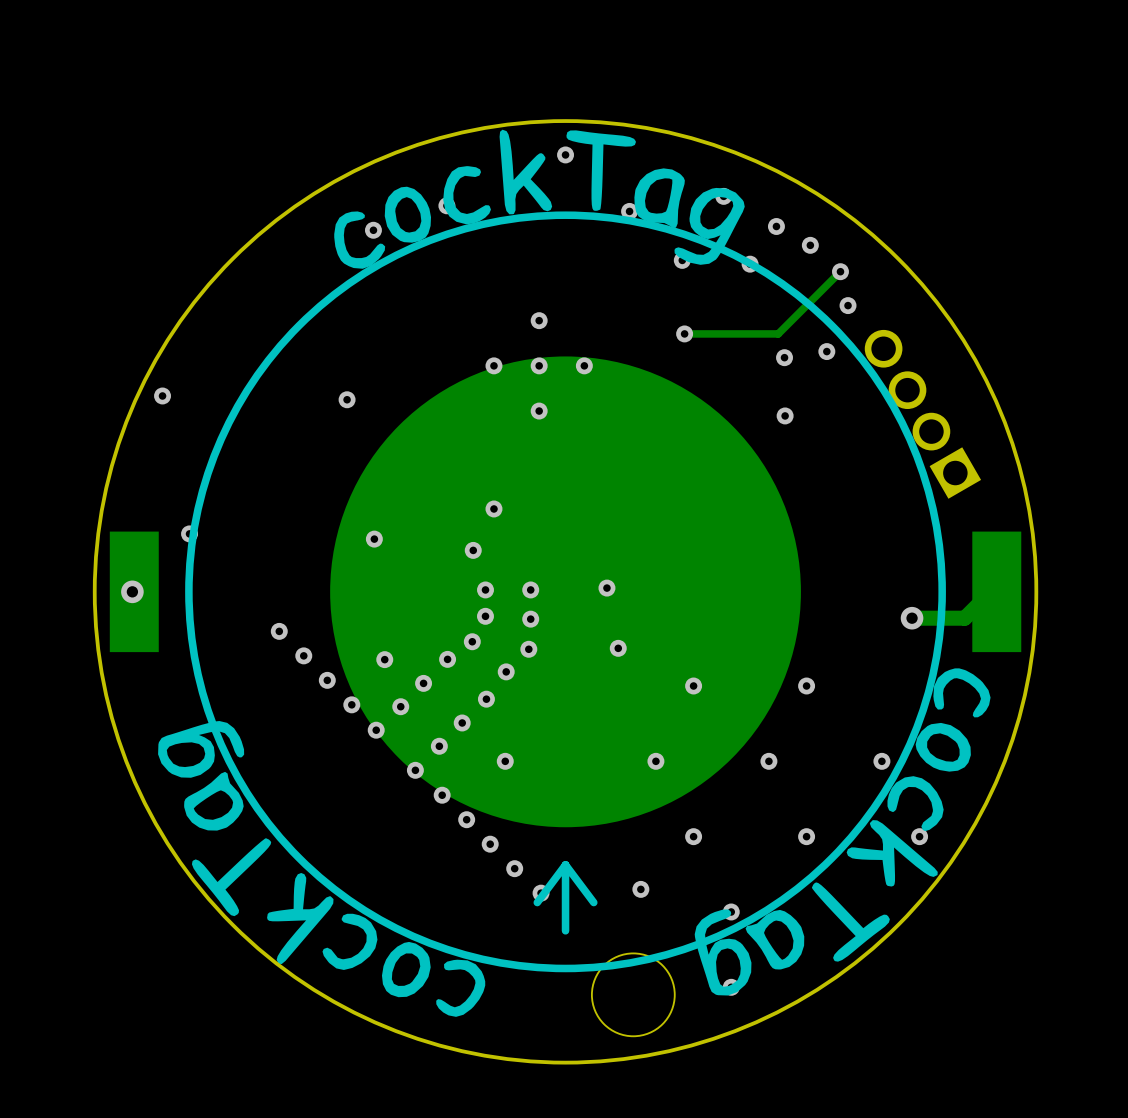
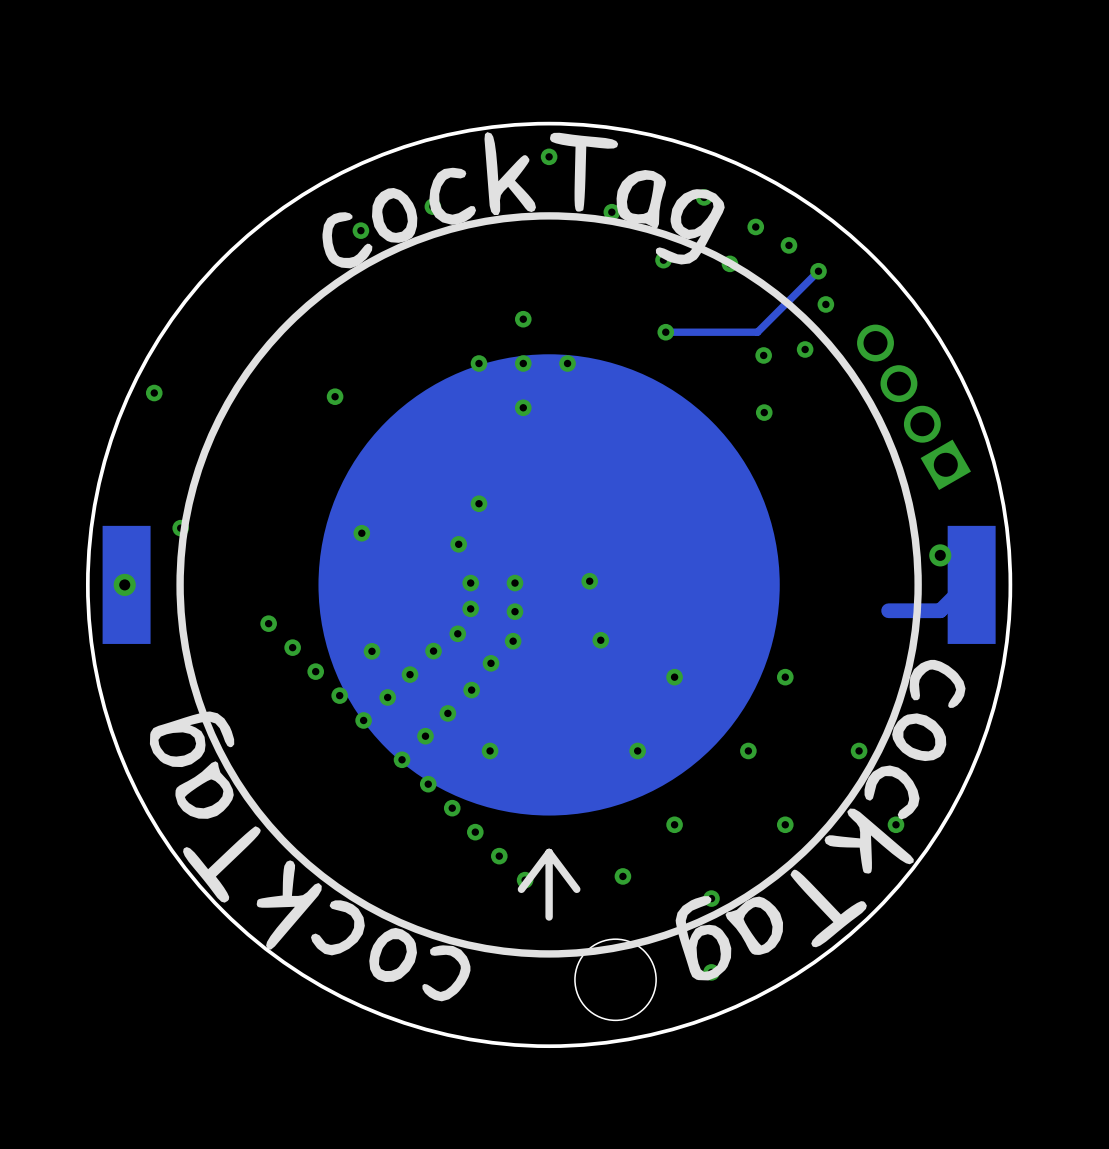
part position: (922, 414) -> (914, 407)
via position: (912, 618) -> (940, 555)

